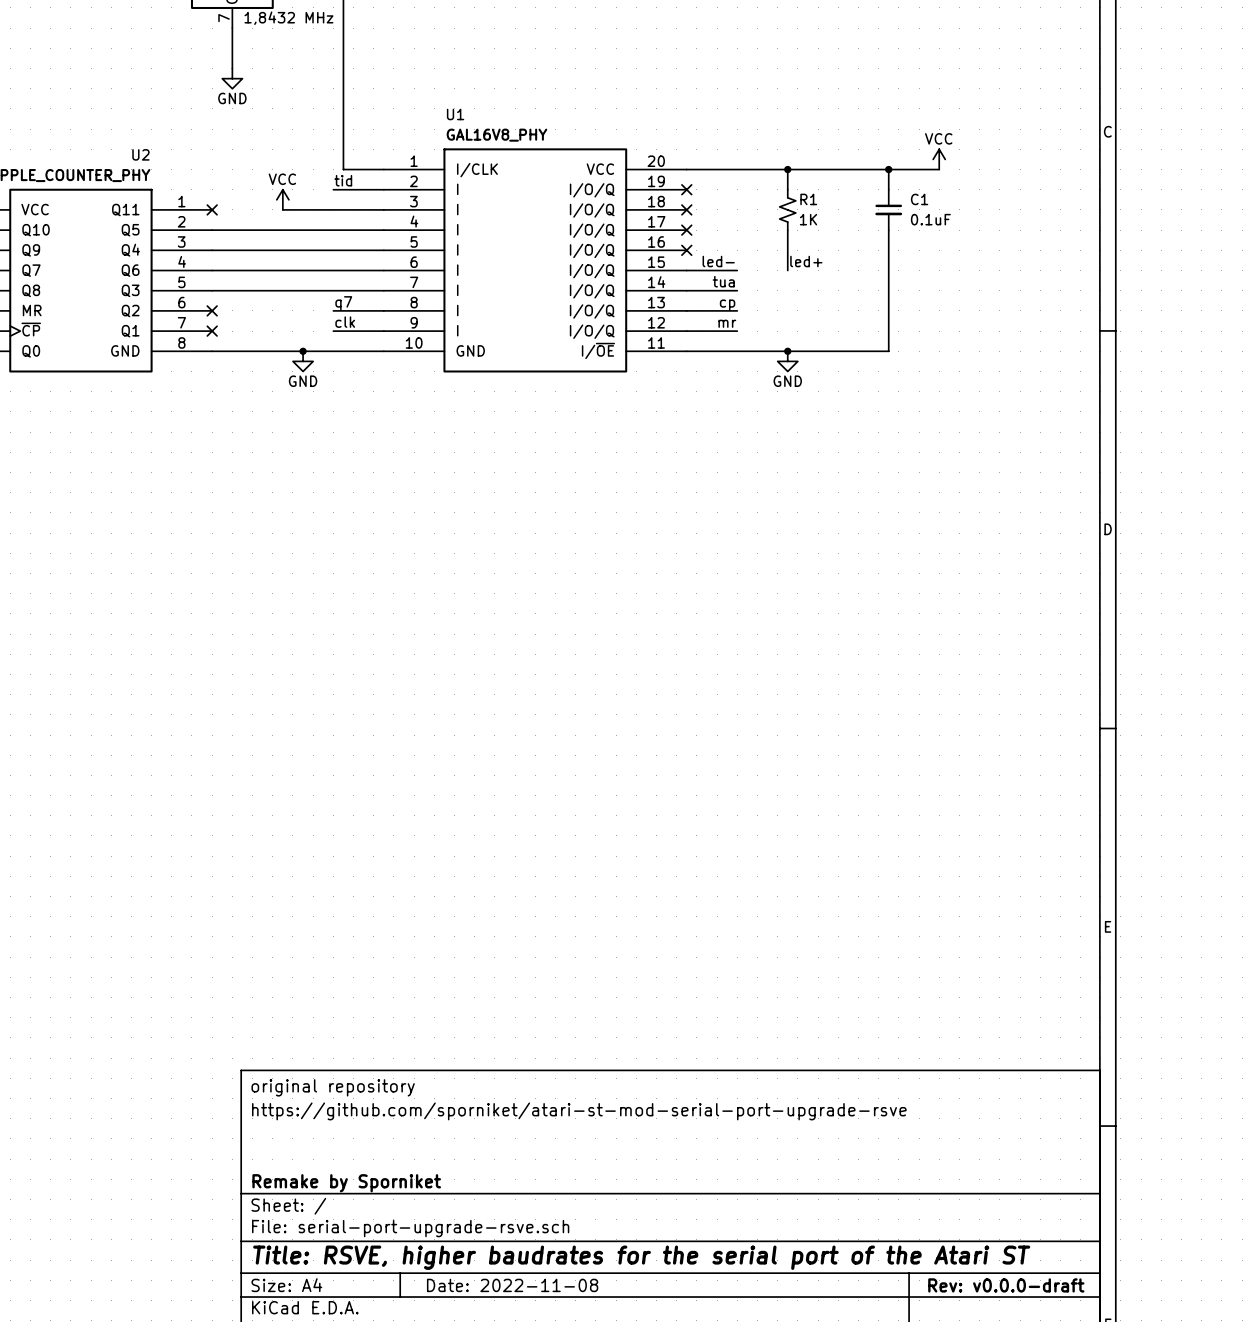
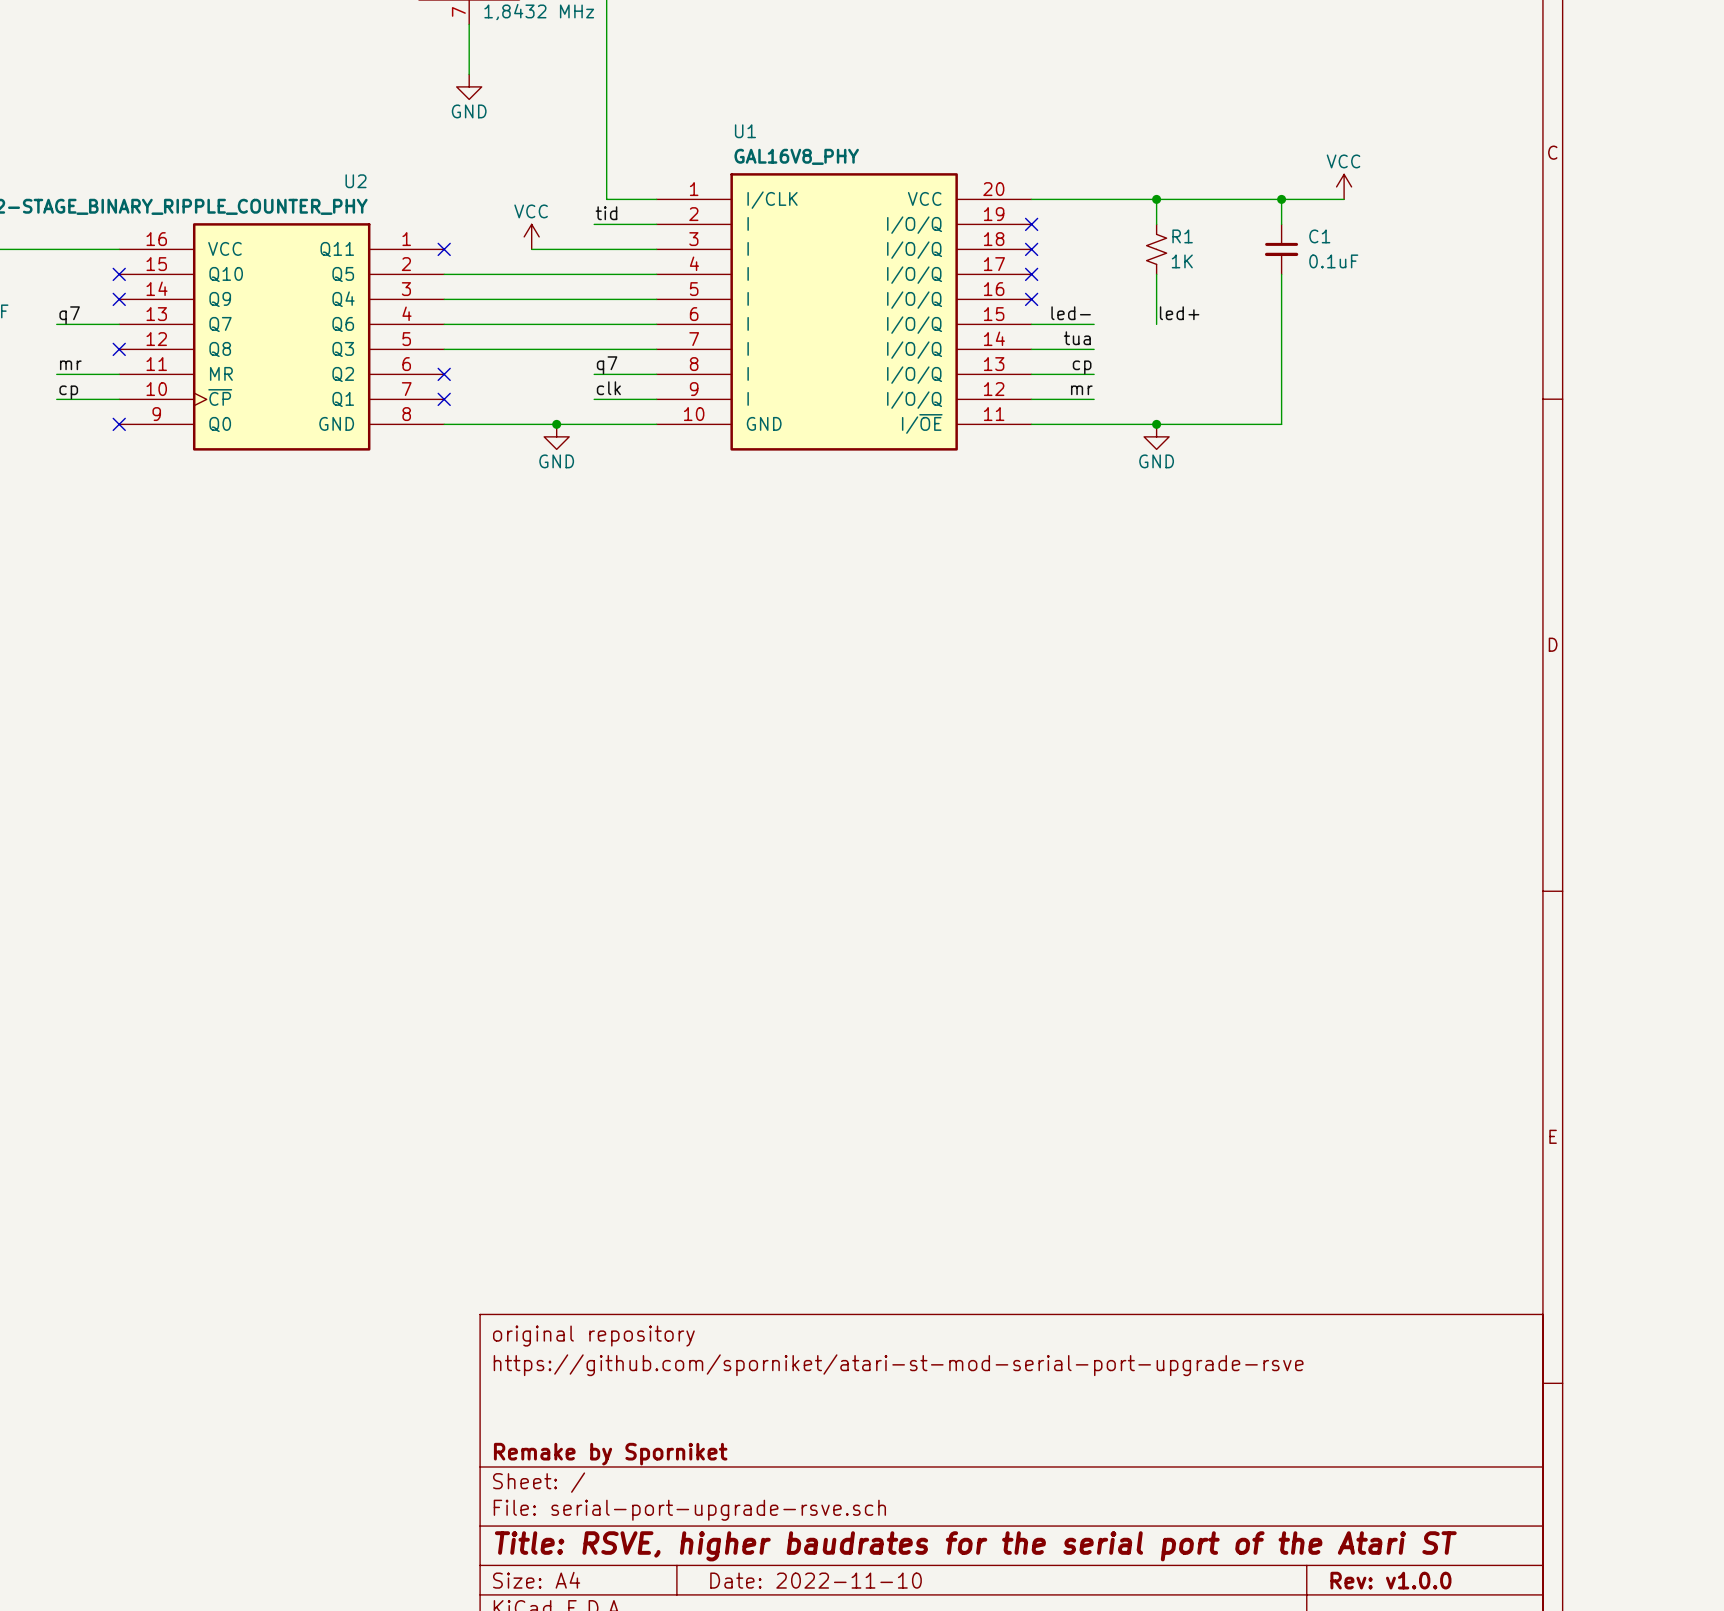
title block: Date: 2022-11-08 (512, 1285) -> Date: 2022-11-10 (816, 1580)
title block: Rev: v0.0.0-draft (1006, 1285) -> Rev: v1.0.0 (1390, 1580)

